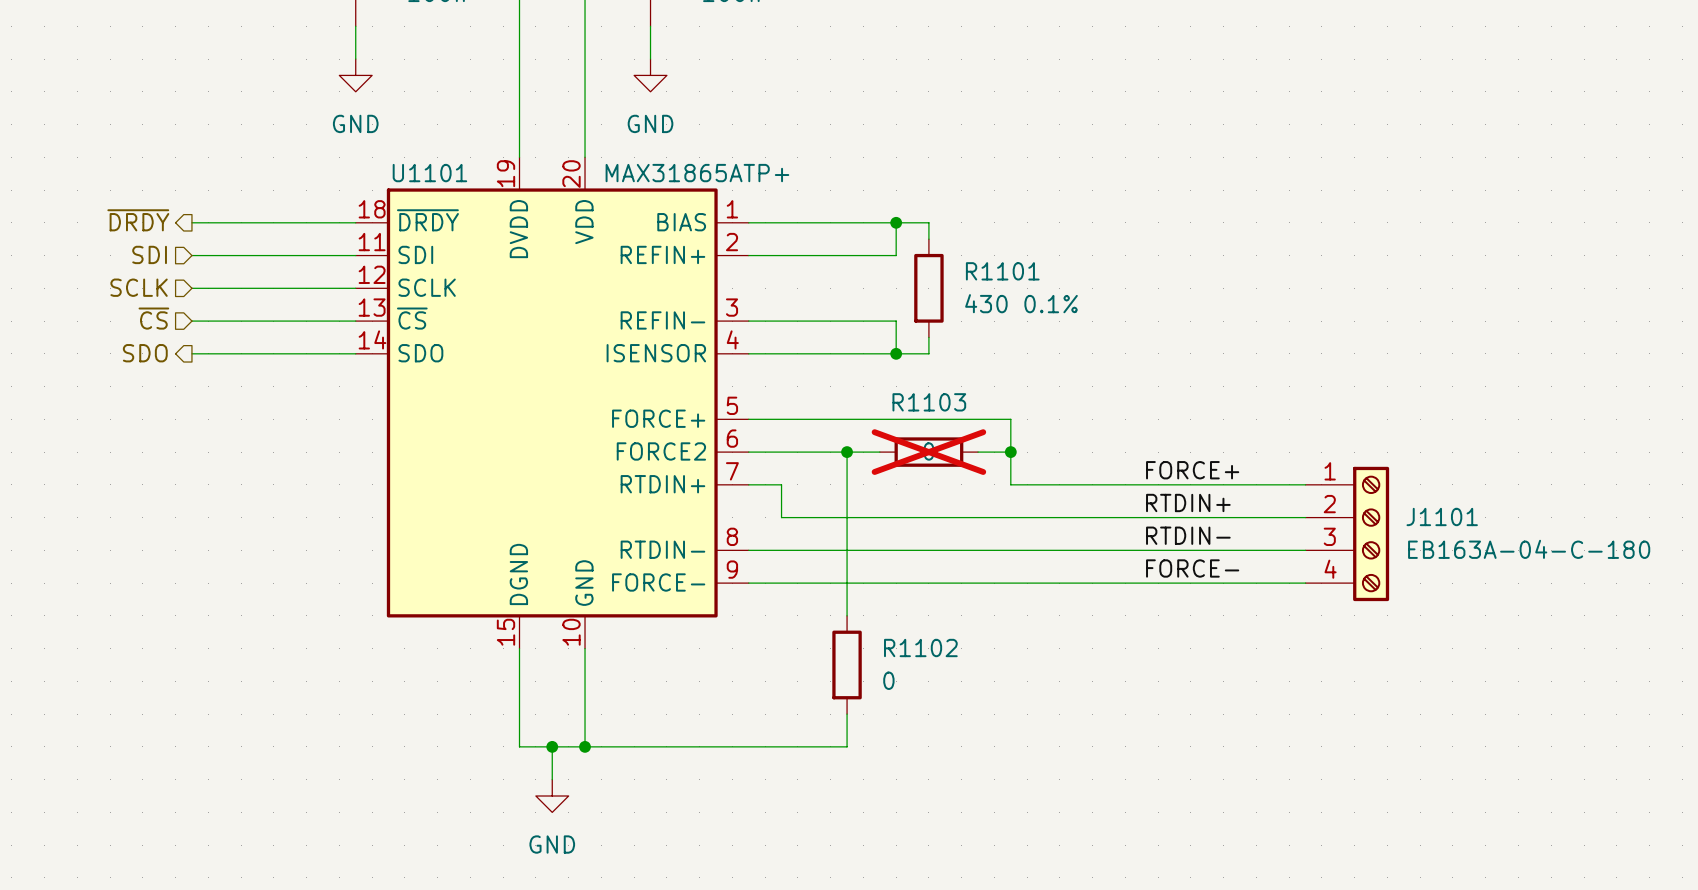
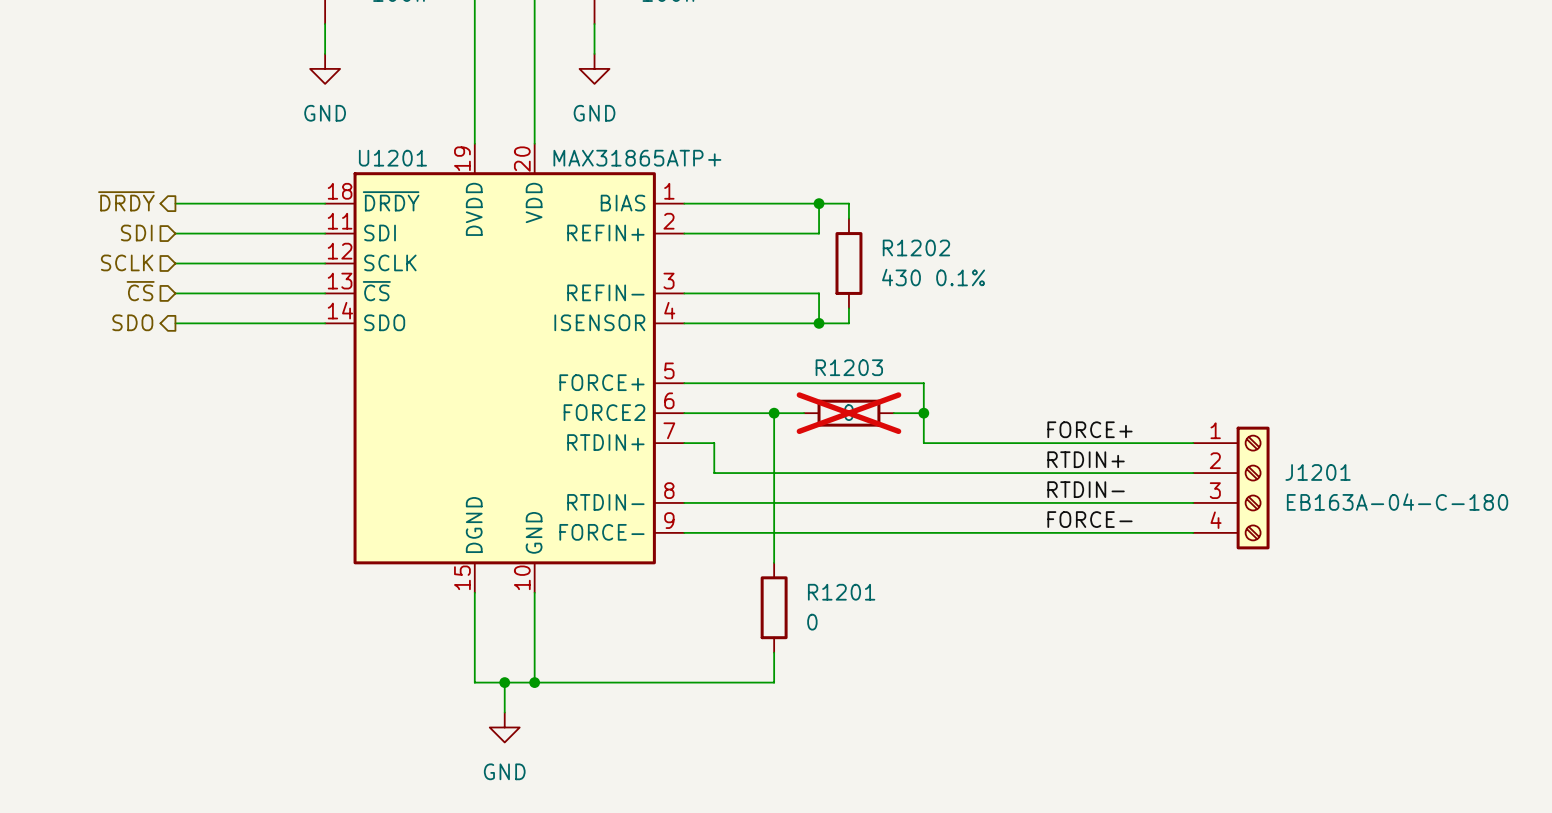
U1101 name: U1101 (429, 173) -> U1201 (392, 158)
R1101 name: R1101 (1002, 271) -> R1202 (916, 247)
R1103 name: R1103 (929, 402) -> R1203 (849, 367)
J1101 name: J1101 (1442, 516) -> J1201 (1318, 472)
R1102 name: R1102 (920, 648) -> R1201 (841, 592)

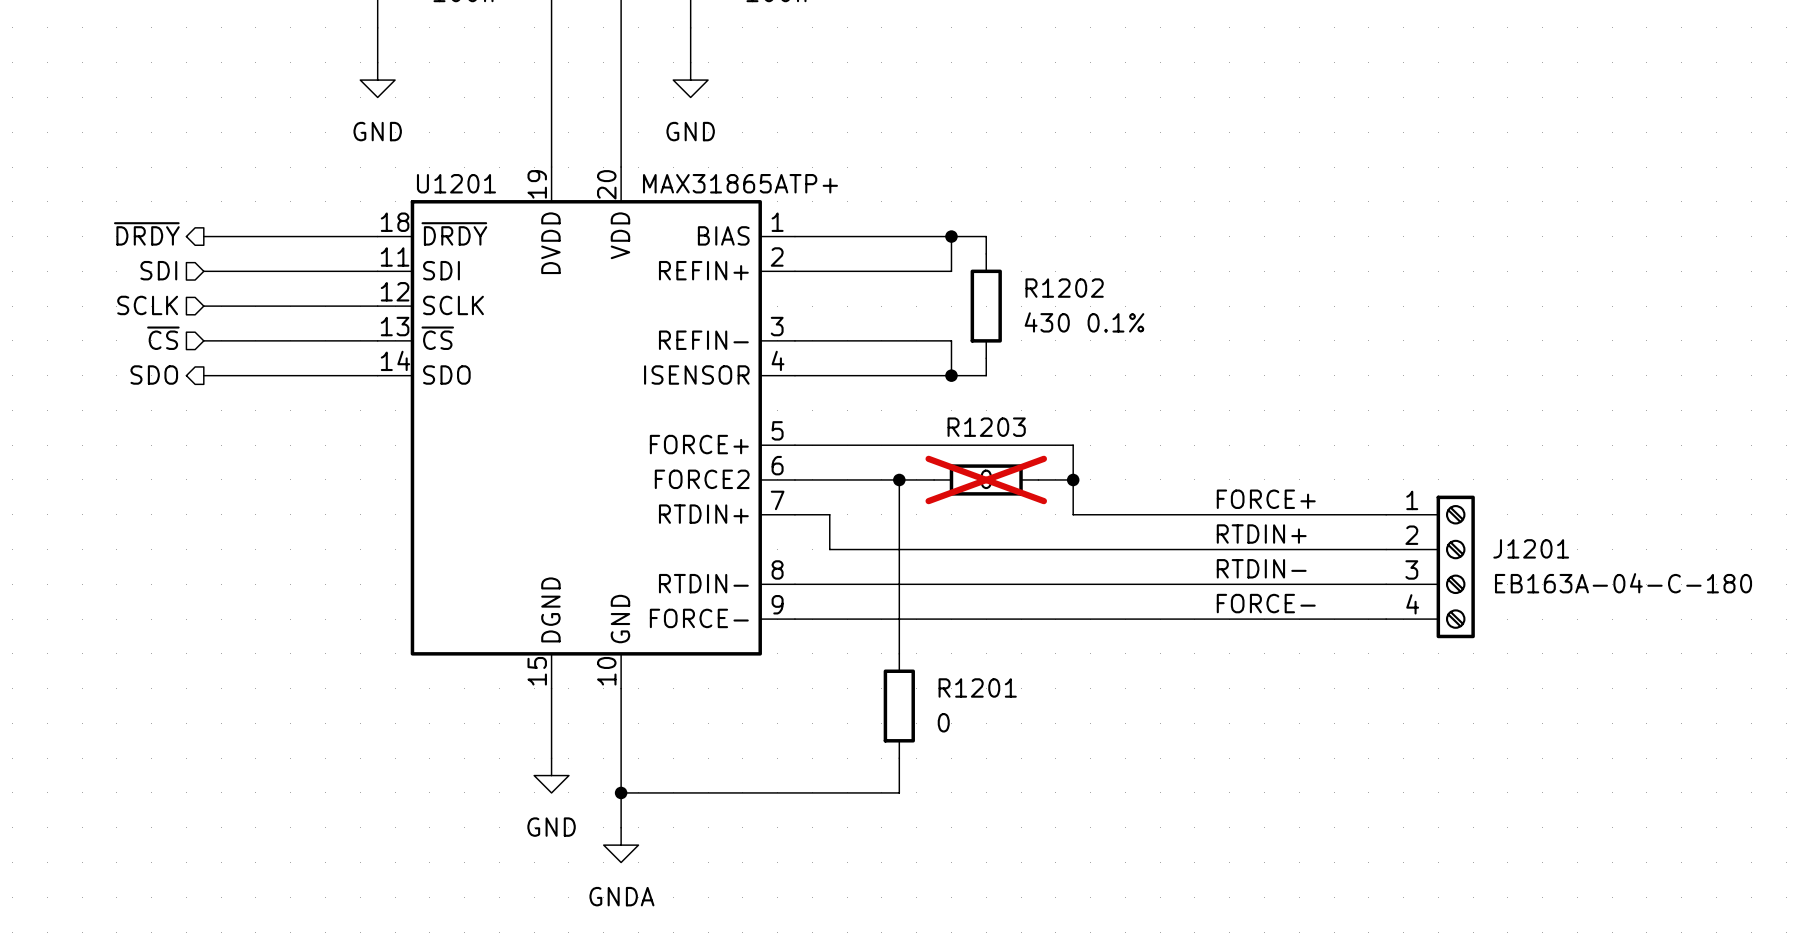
wire: (474, 652) (474, 682) (534, 682) -> (621, 827) (621, 792)
wire: (504, 682) (504, 712) -> none
junction: (504, 682) -> none
power symbol position: GND (504, 727) -> GND (551, 775)
power symbol: none -> GNDA (621, 845)

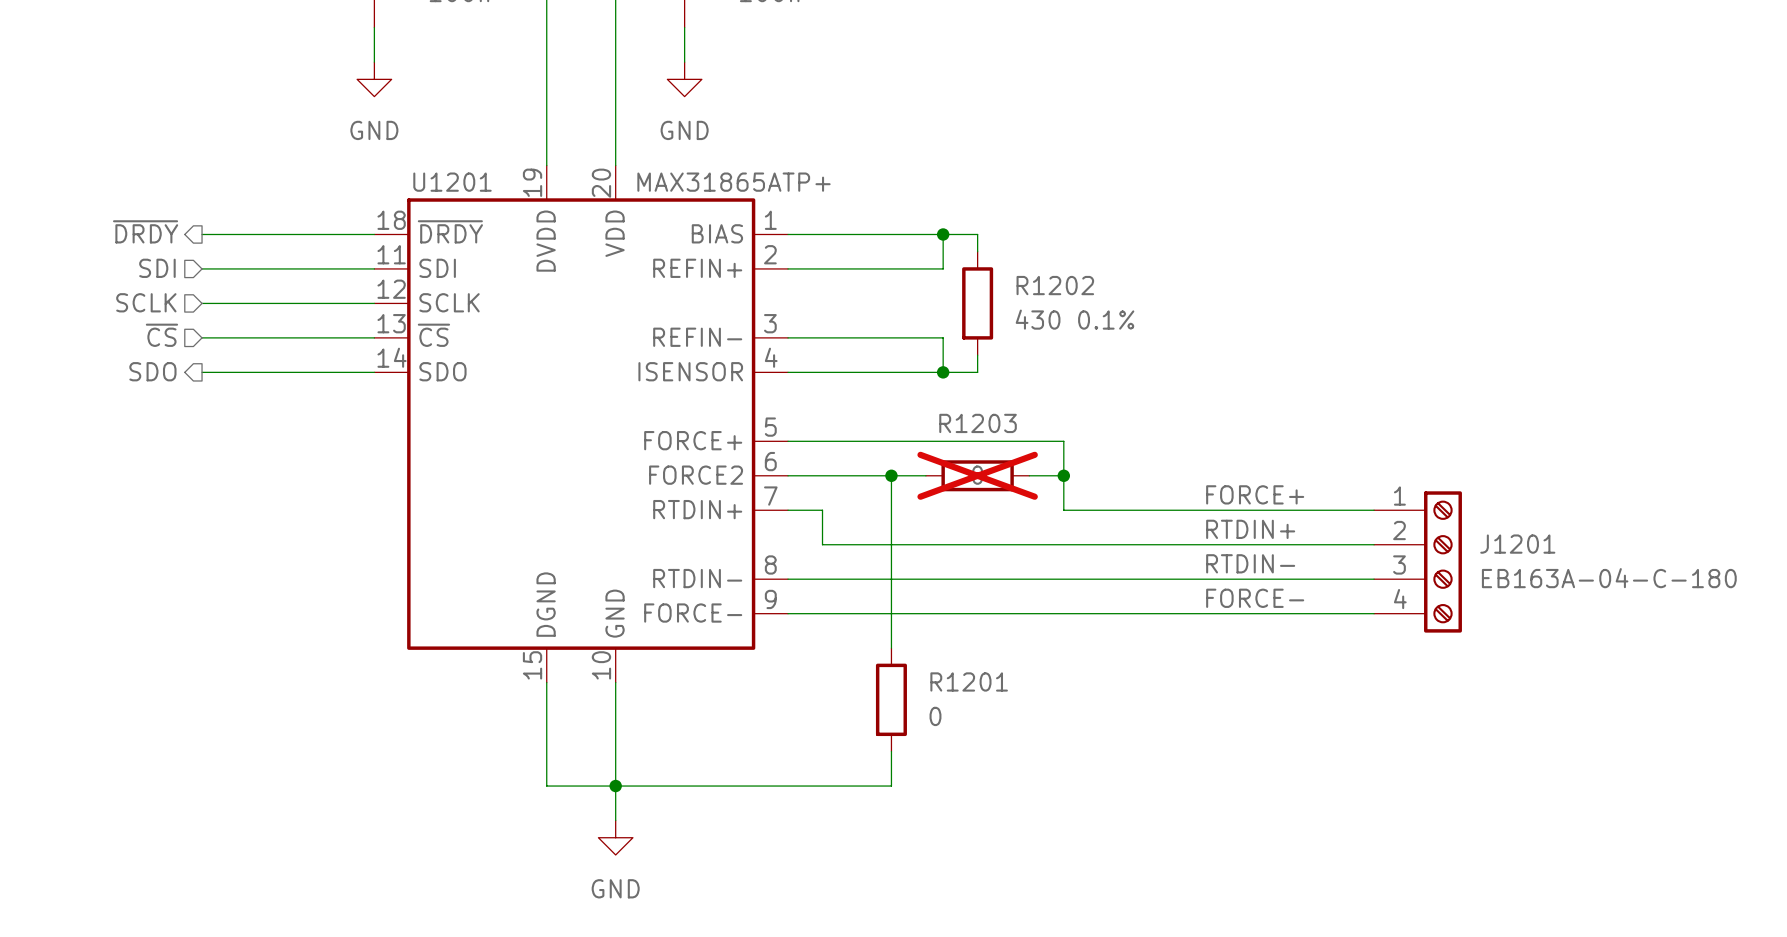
wire: none -> (546, 751) (546, 786) (615, 786)
power symbol: GND (551, 775) -> none
power symbol: GNDA (621, 845) -> GND (615, 837)

